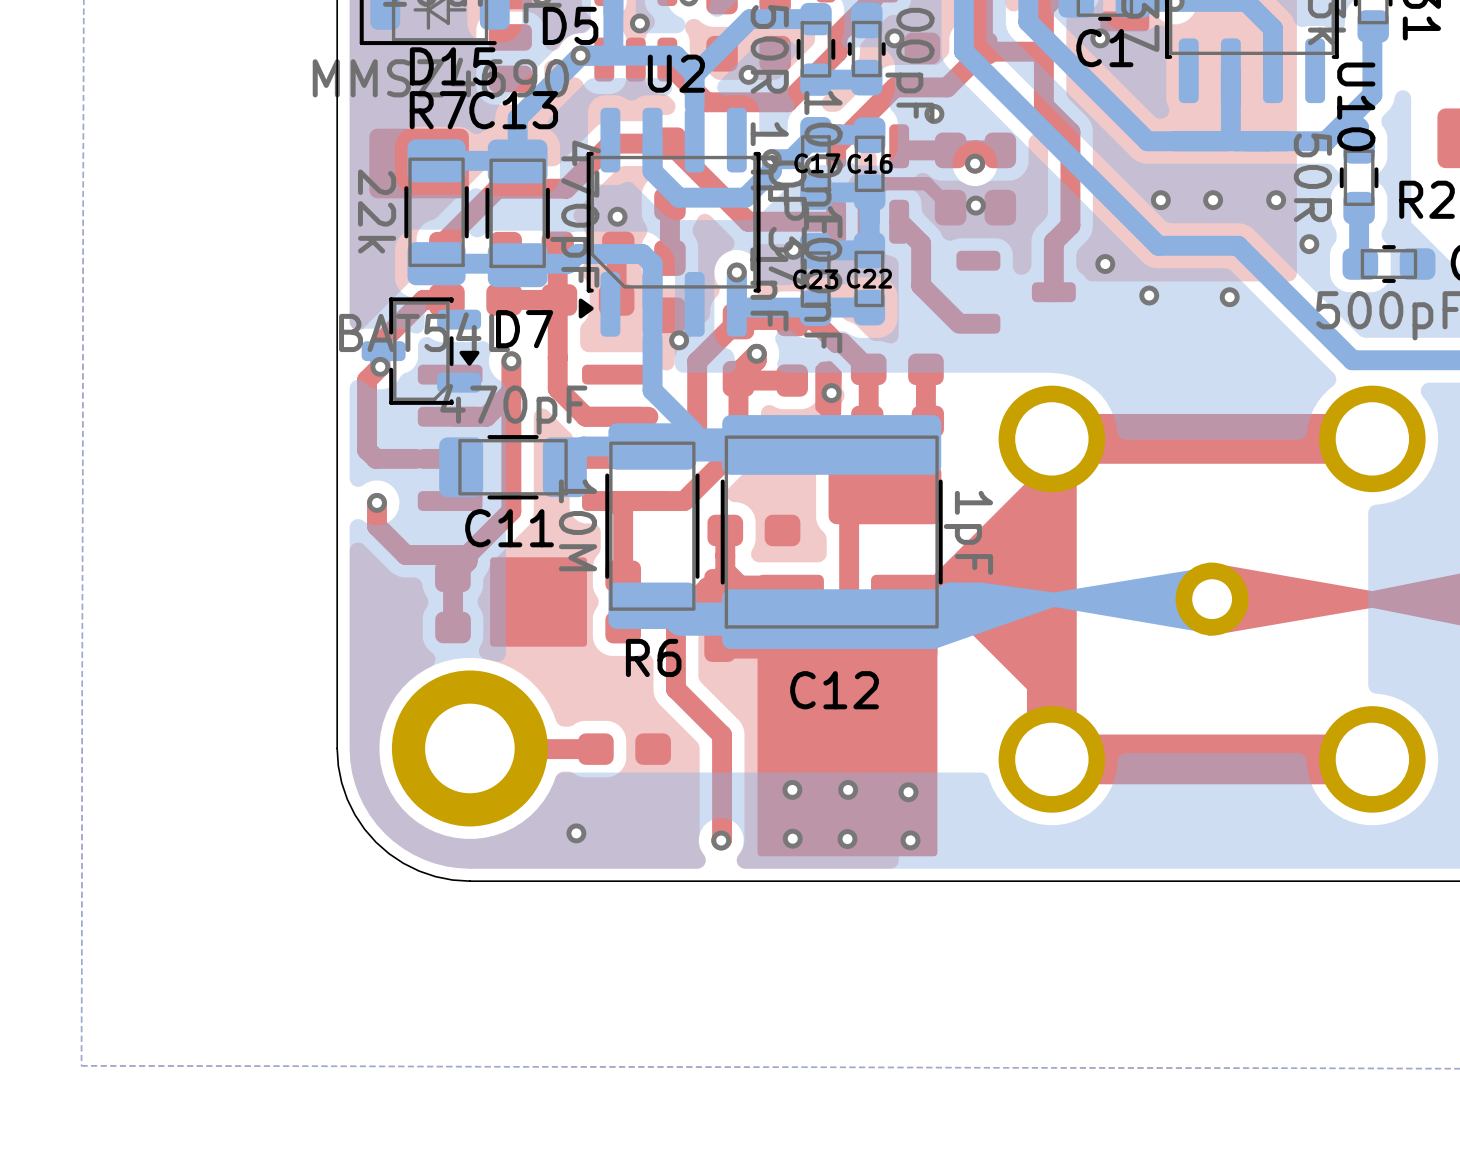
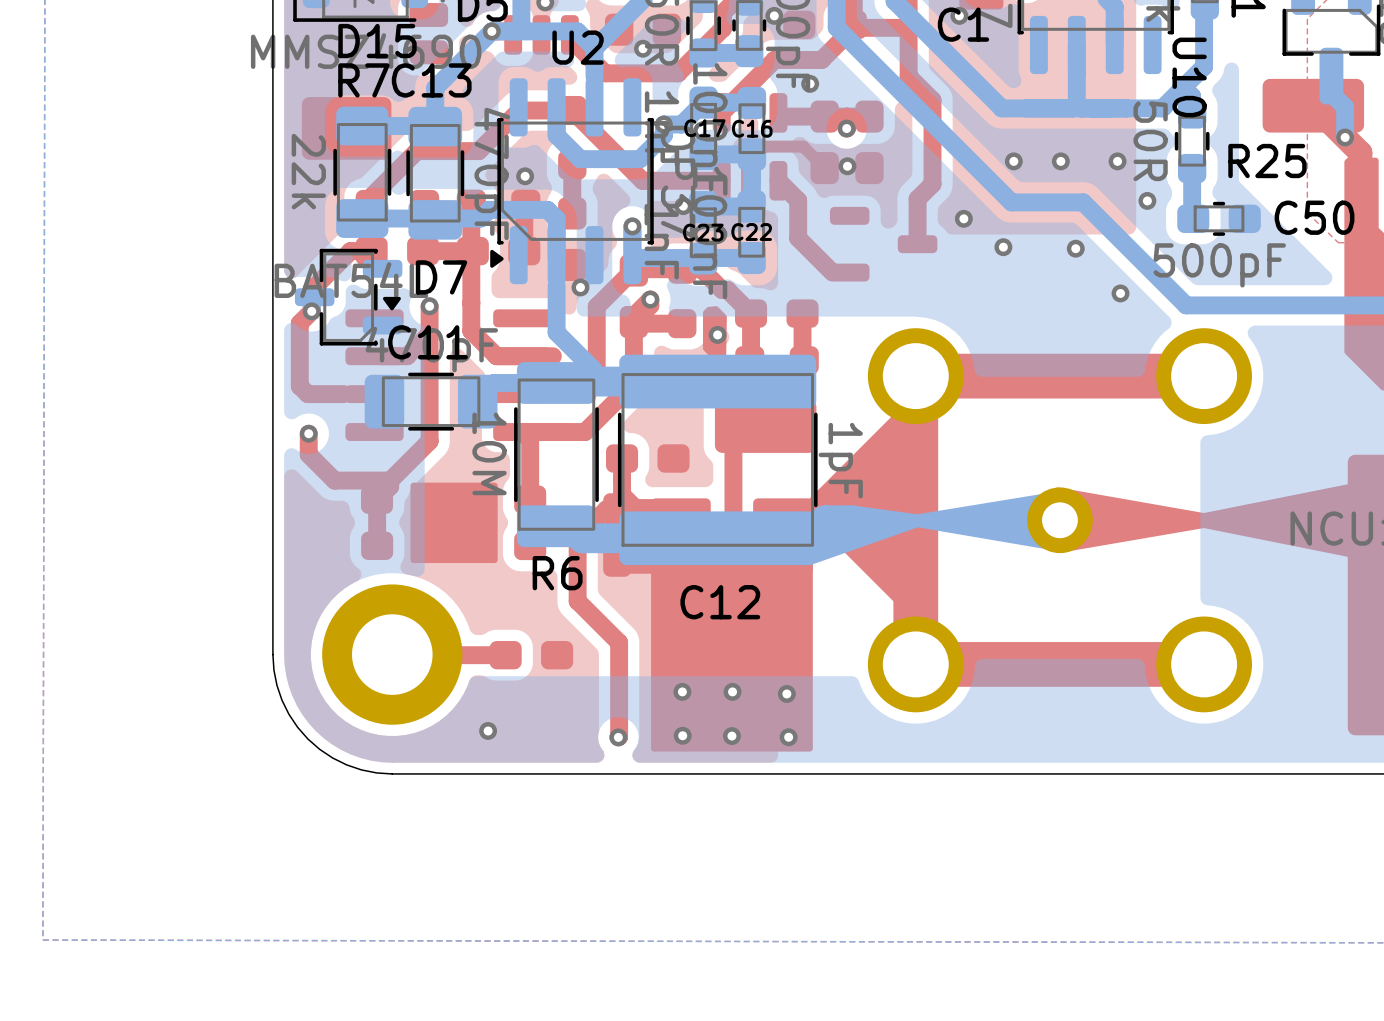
via: none -> (1120, 293)
C11 name position: C11 (509, 528) -> C11 (427, 342)

